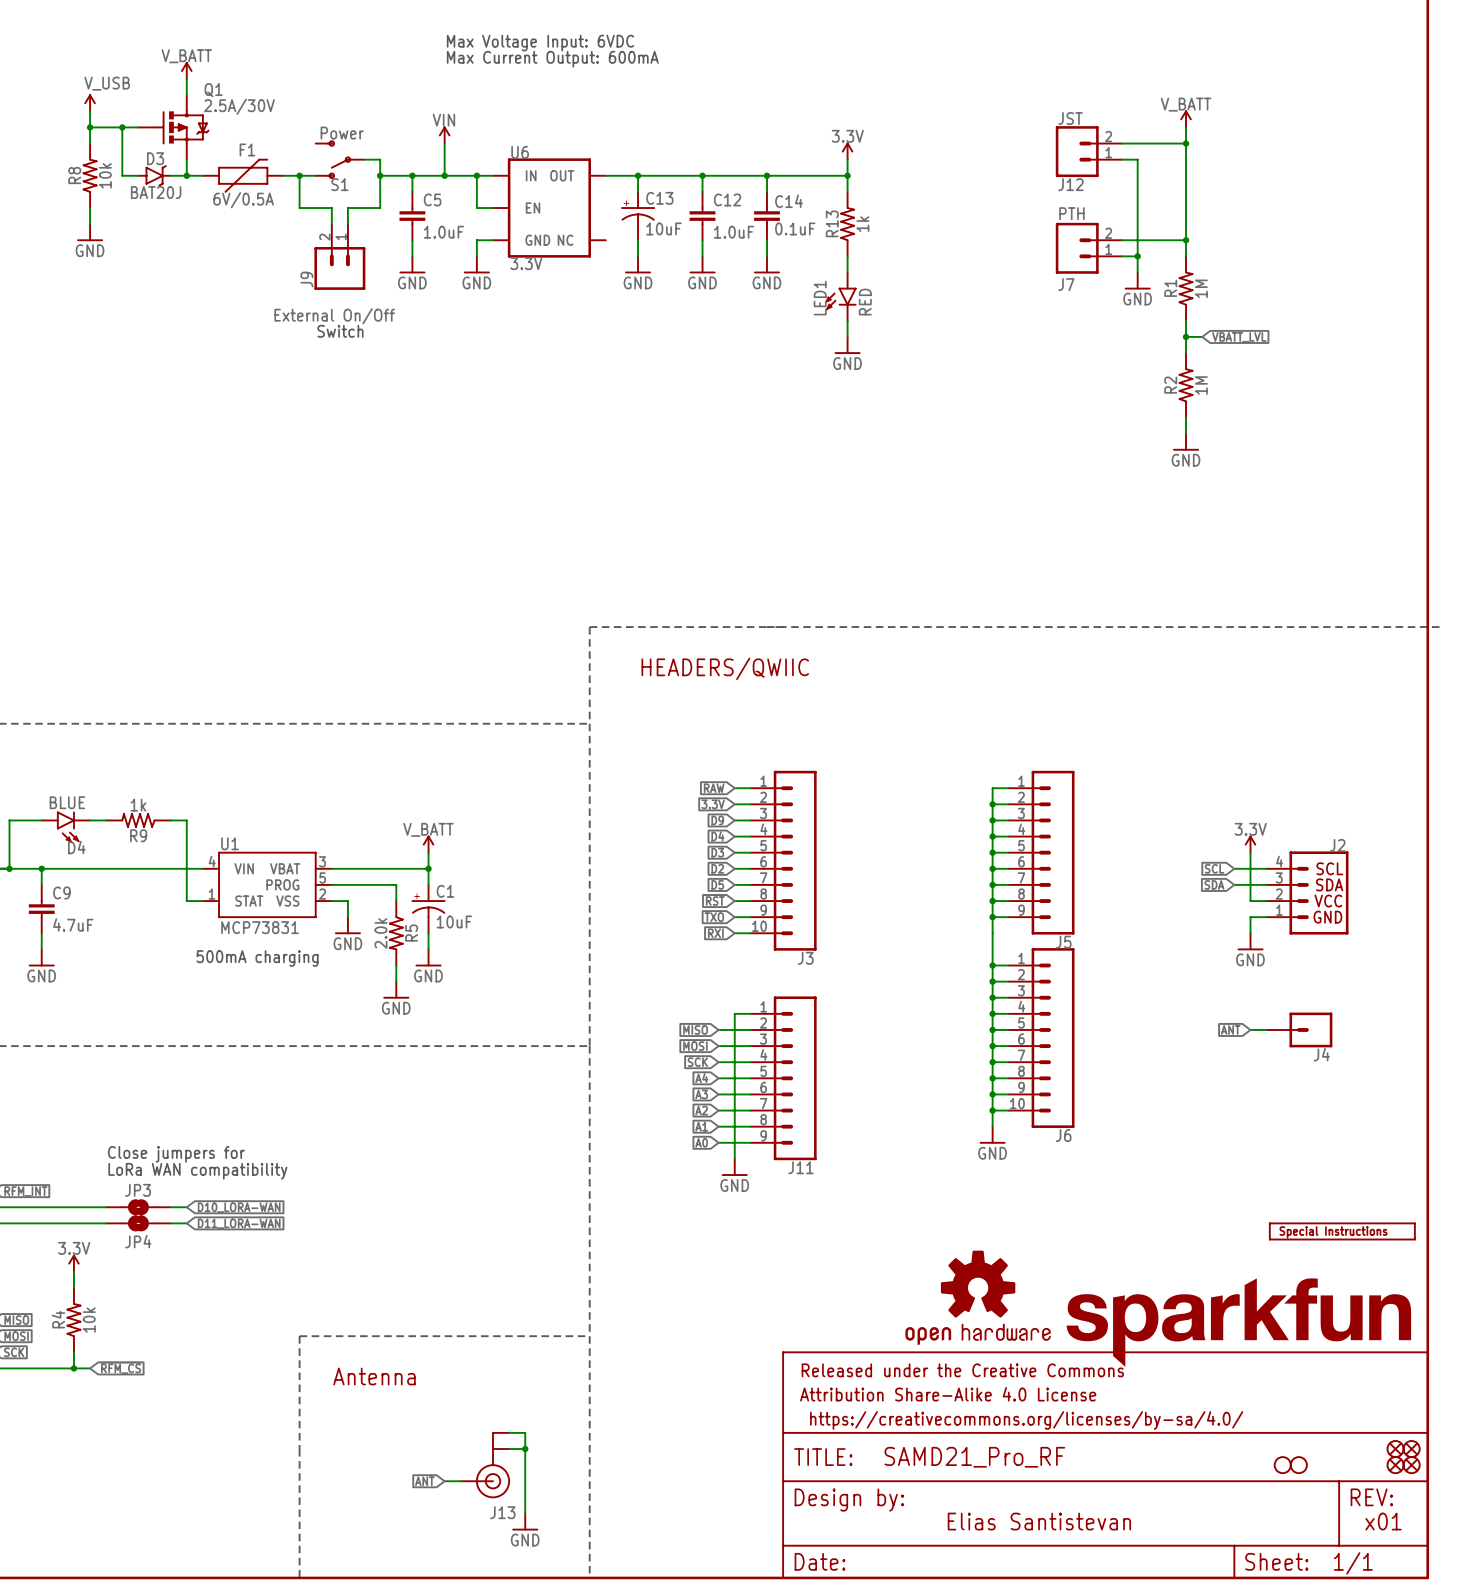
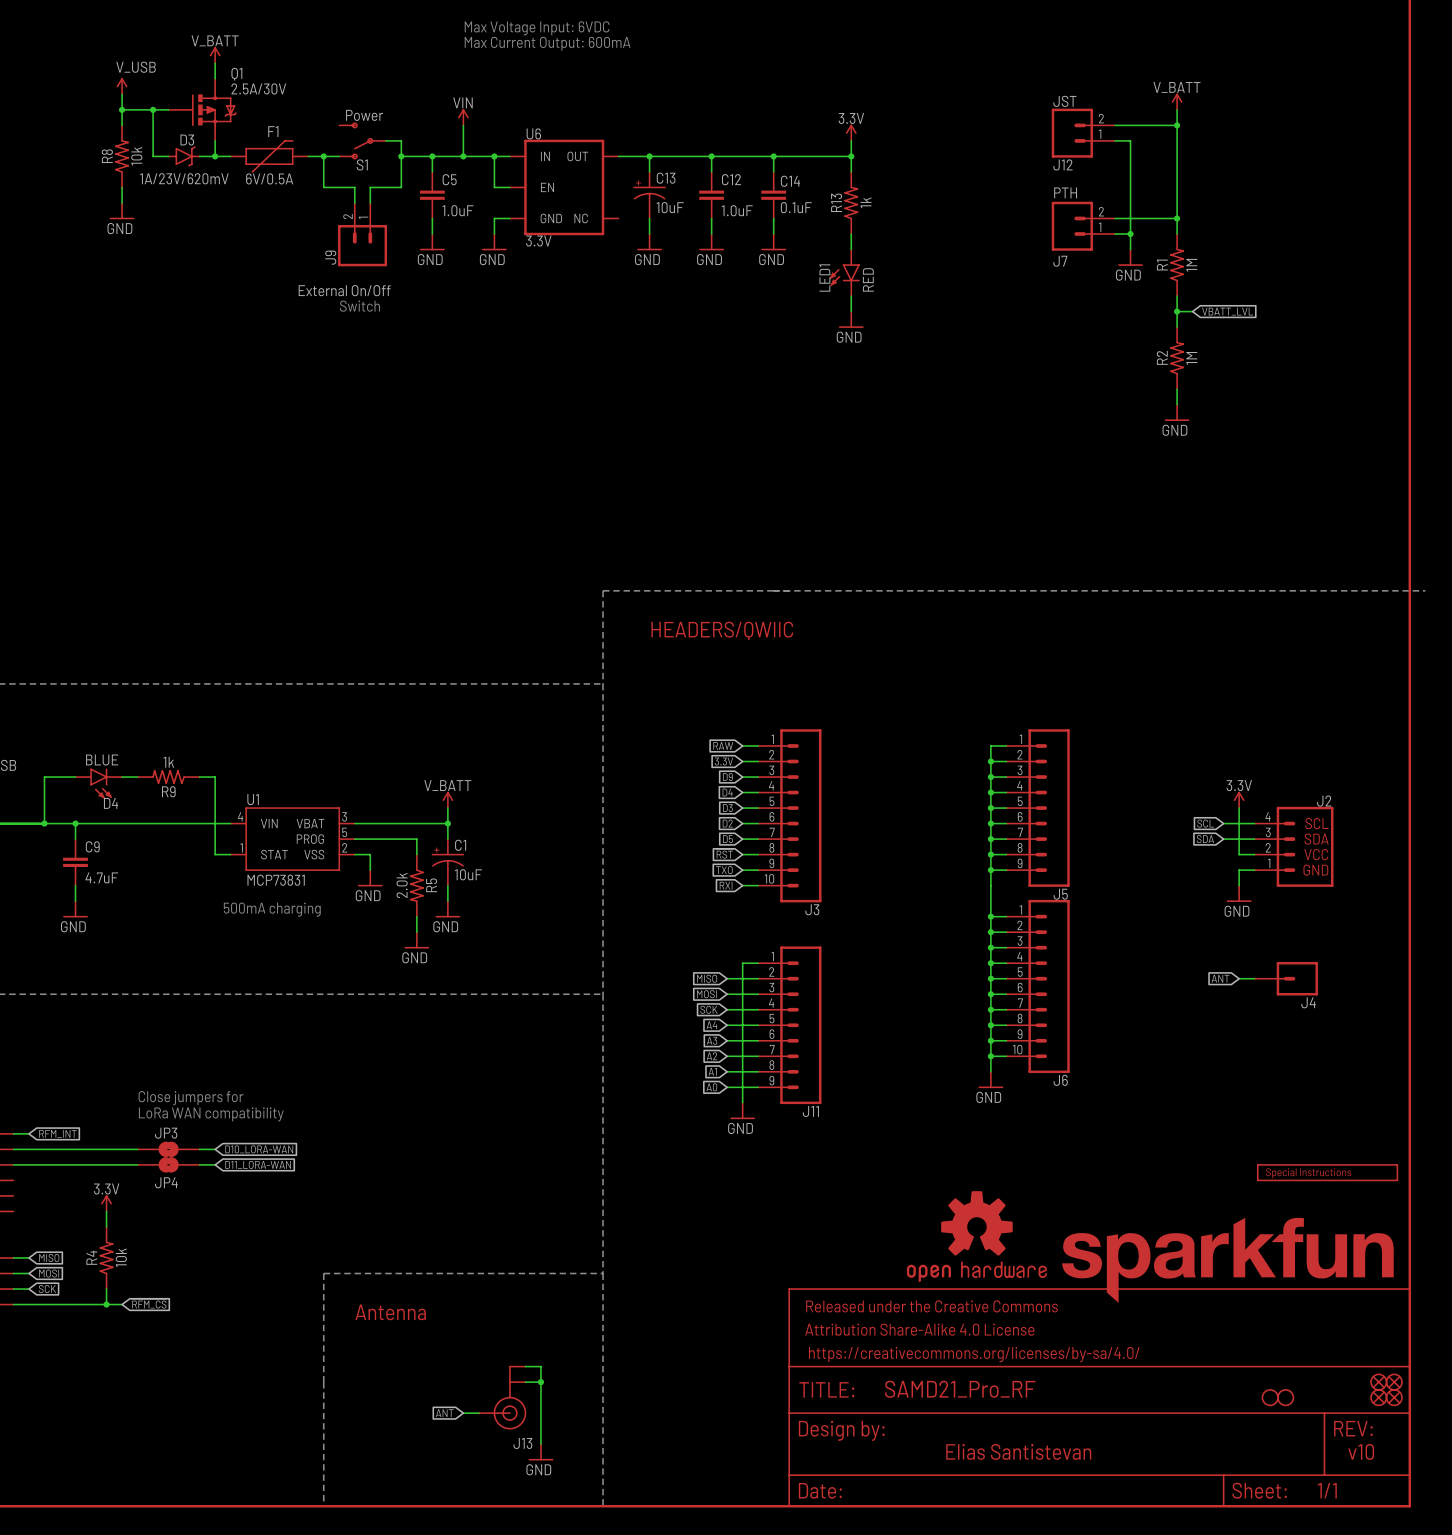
D3 value: BAT20J (156, 192) -> 1A/23V/620mV (184, 178)
text: x01 (1383, 1521) -> v10 (1361, 1451)

